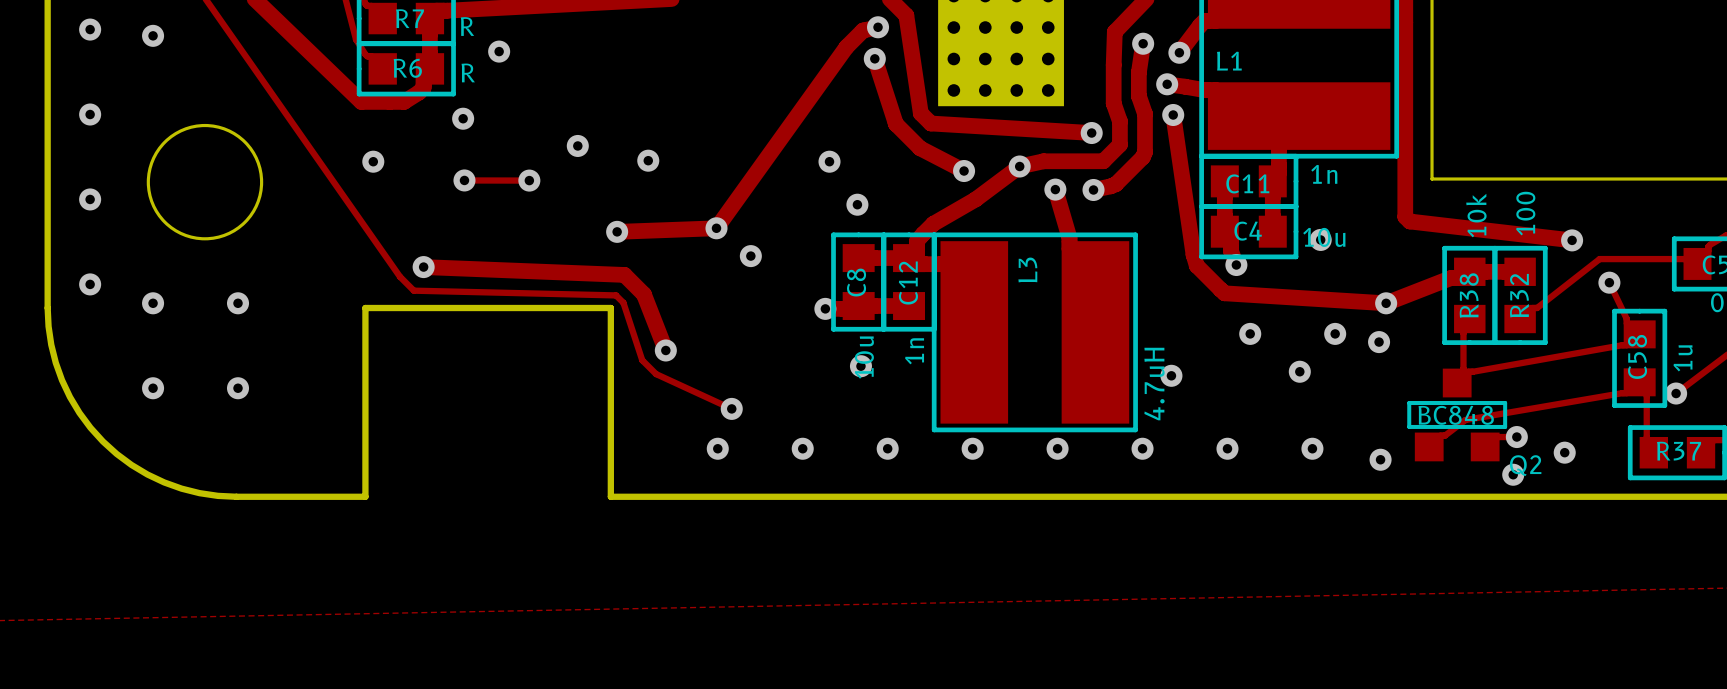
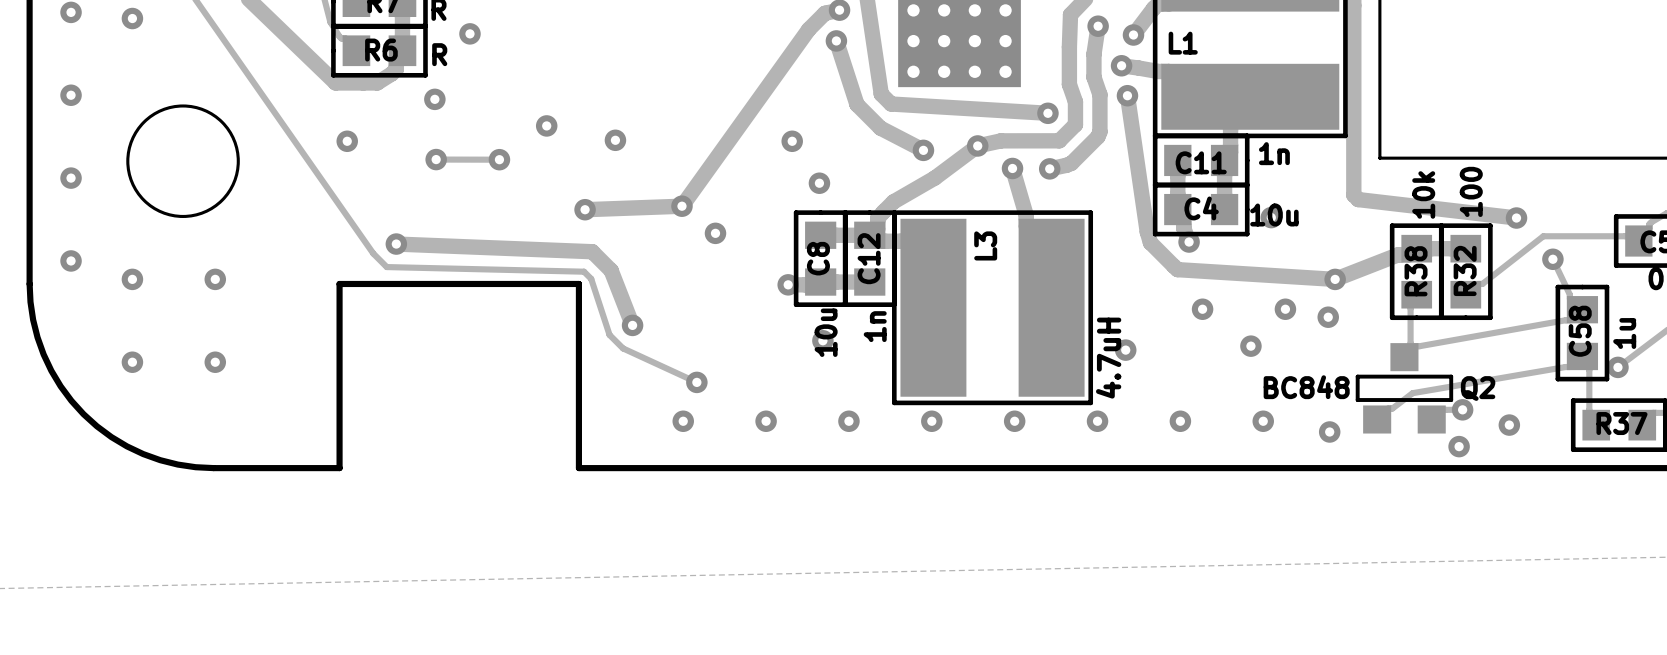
Q2 value position: BC848 (1456, 415) -> BC848 (1306, 387)
Q2 name position: Q2 (1525, 465) -> Q2 (1478, 388)

